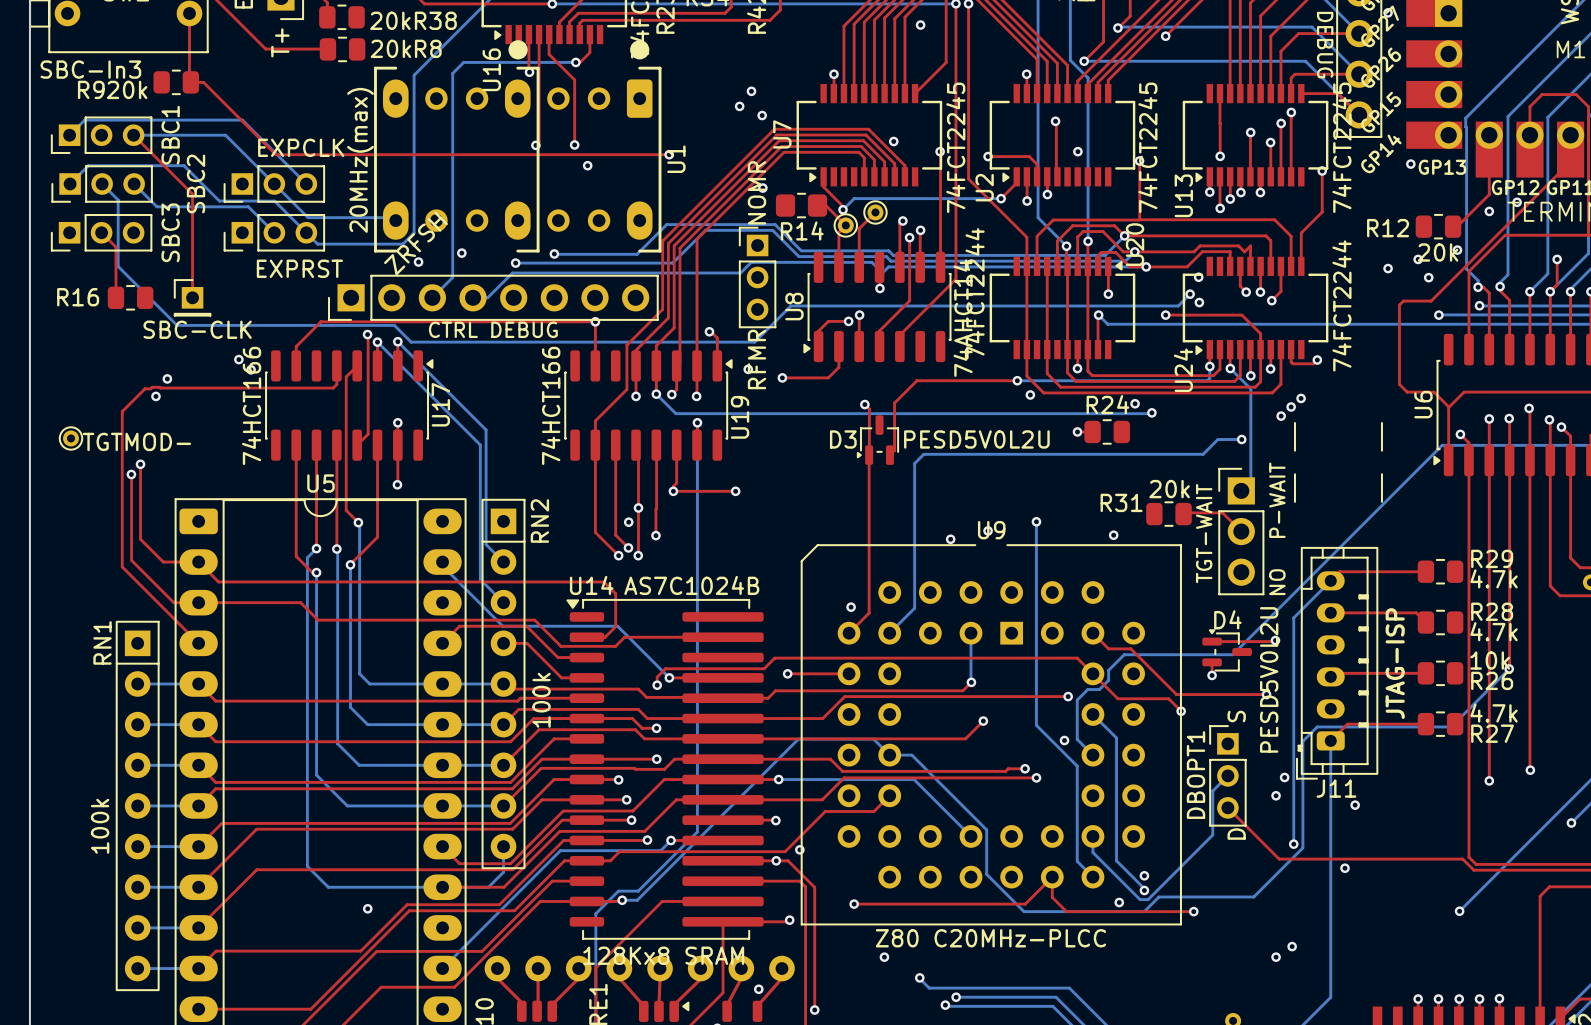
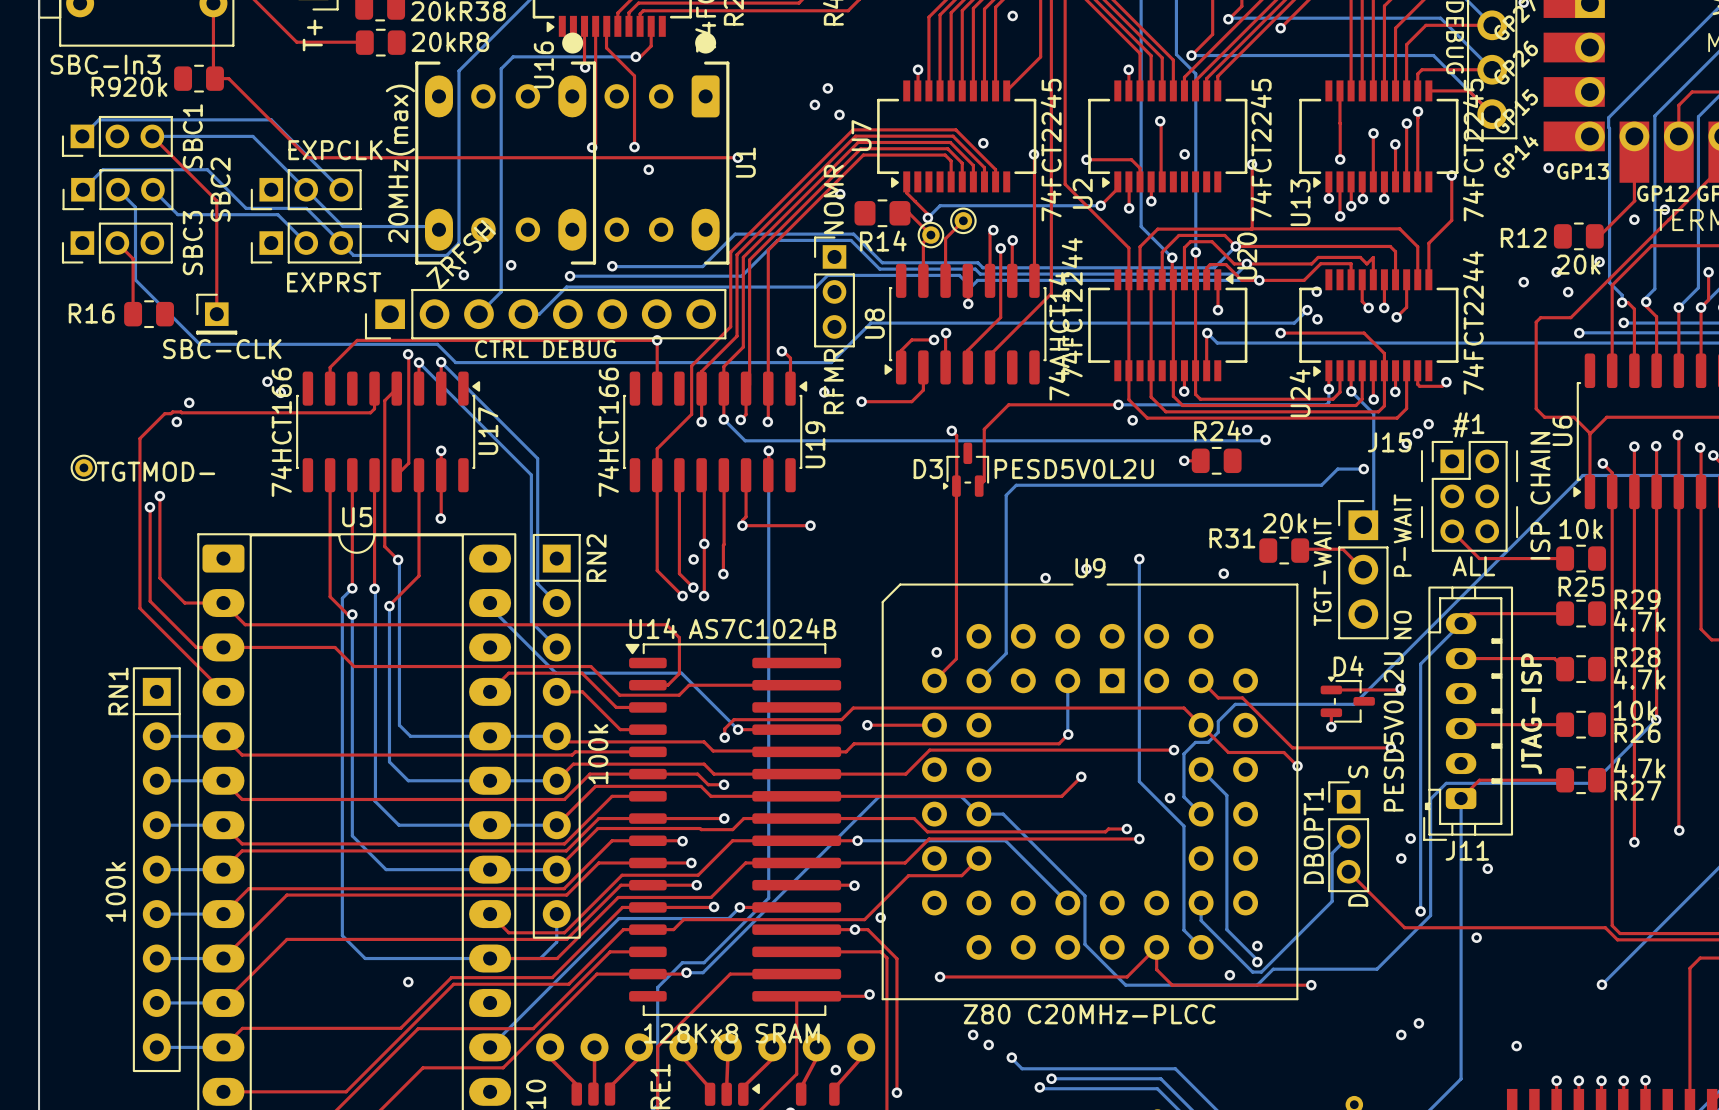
J15: none -> (1469, 496)
top track: none -> (1452, 531) (1479, 558) (1565, 558)
R25: none -> 10k (1581, 558)
via: none -> (988, 1044)
via: none -> (1516, 1046)

